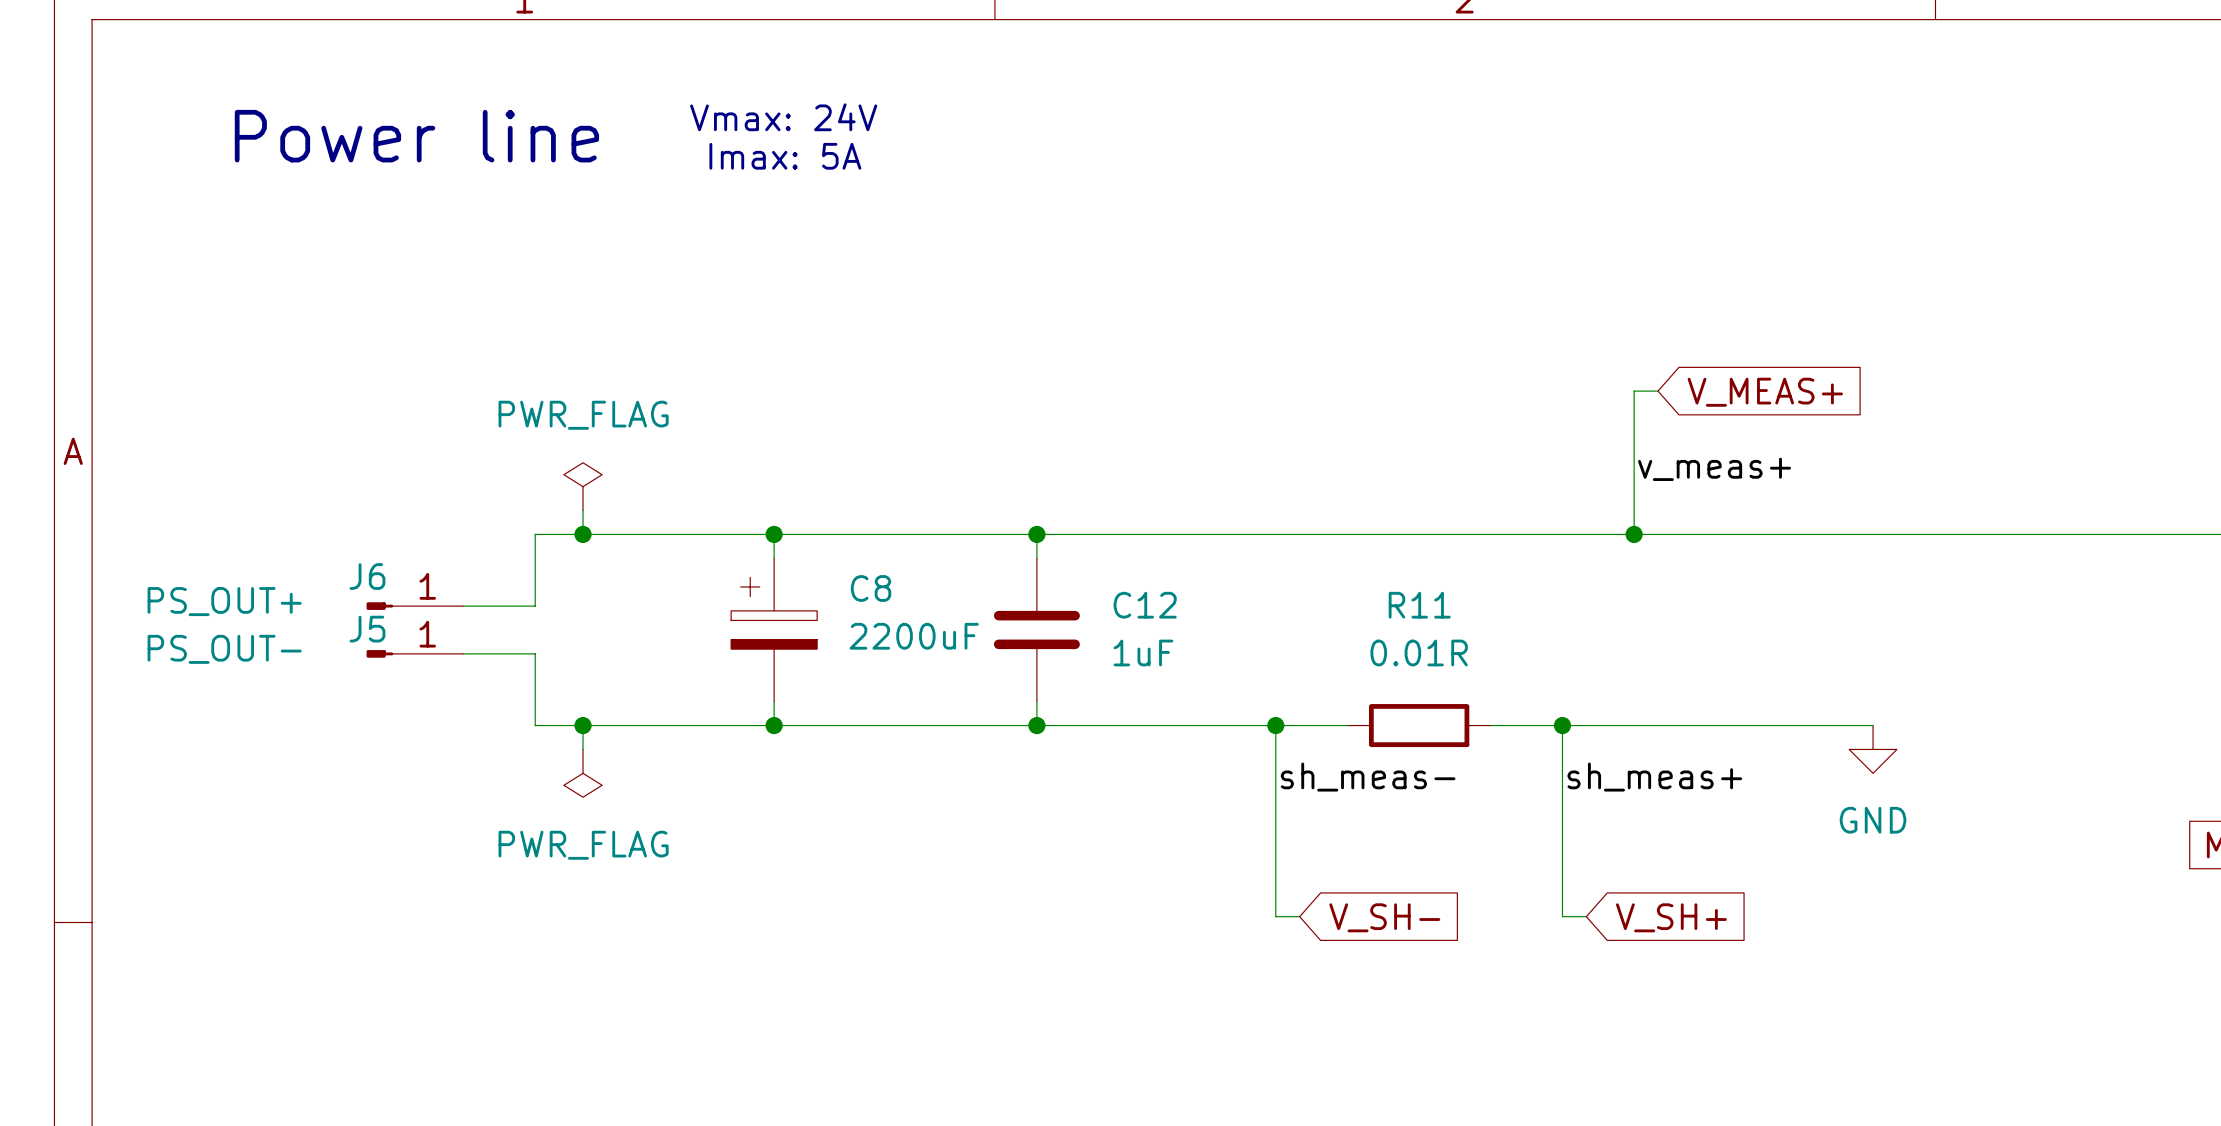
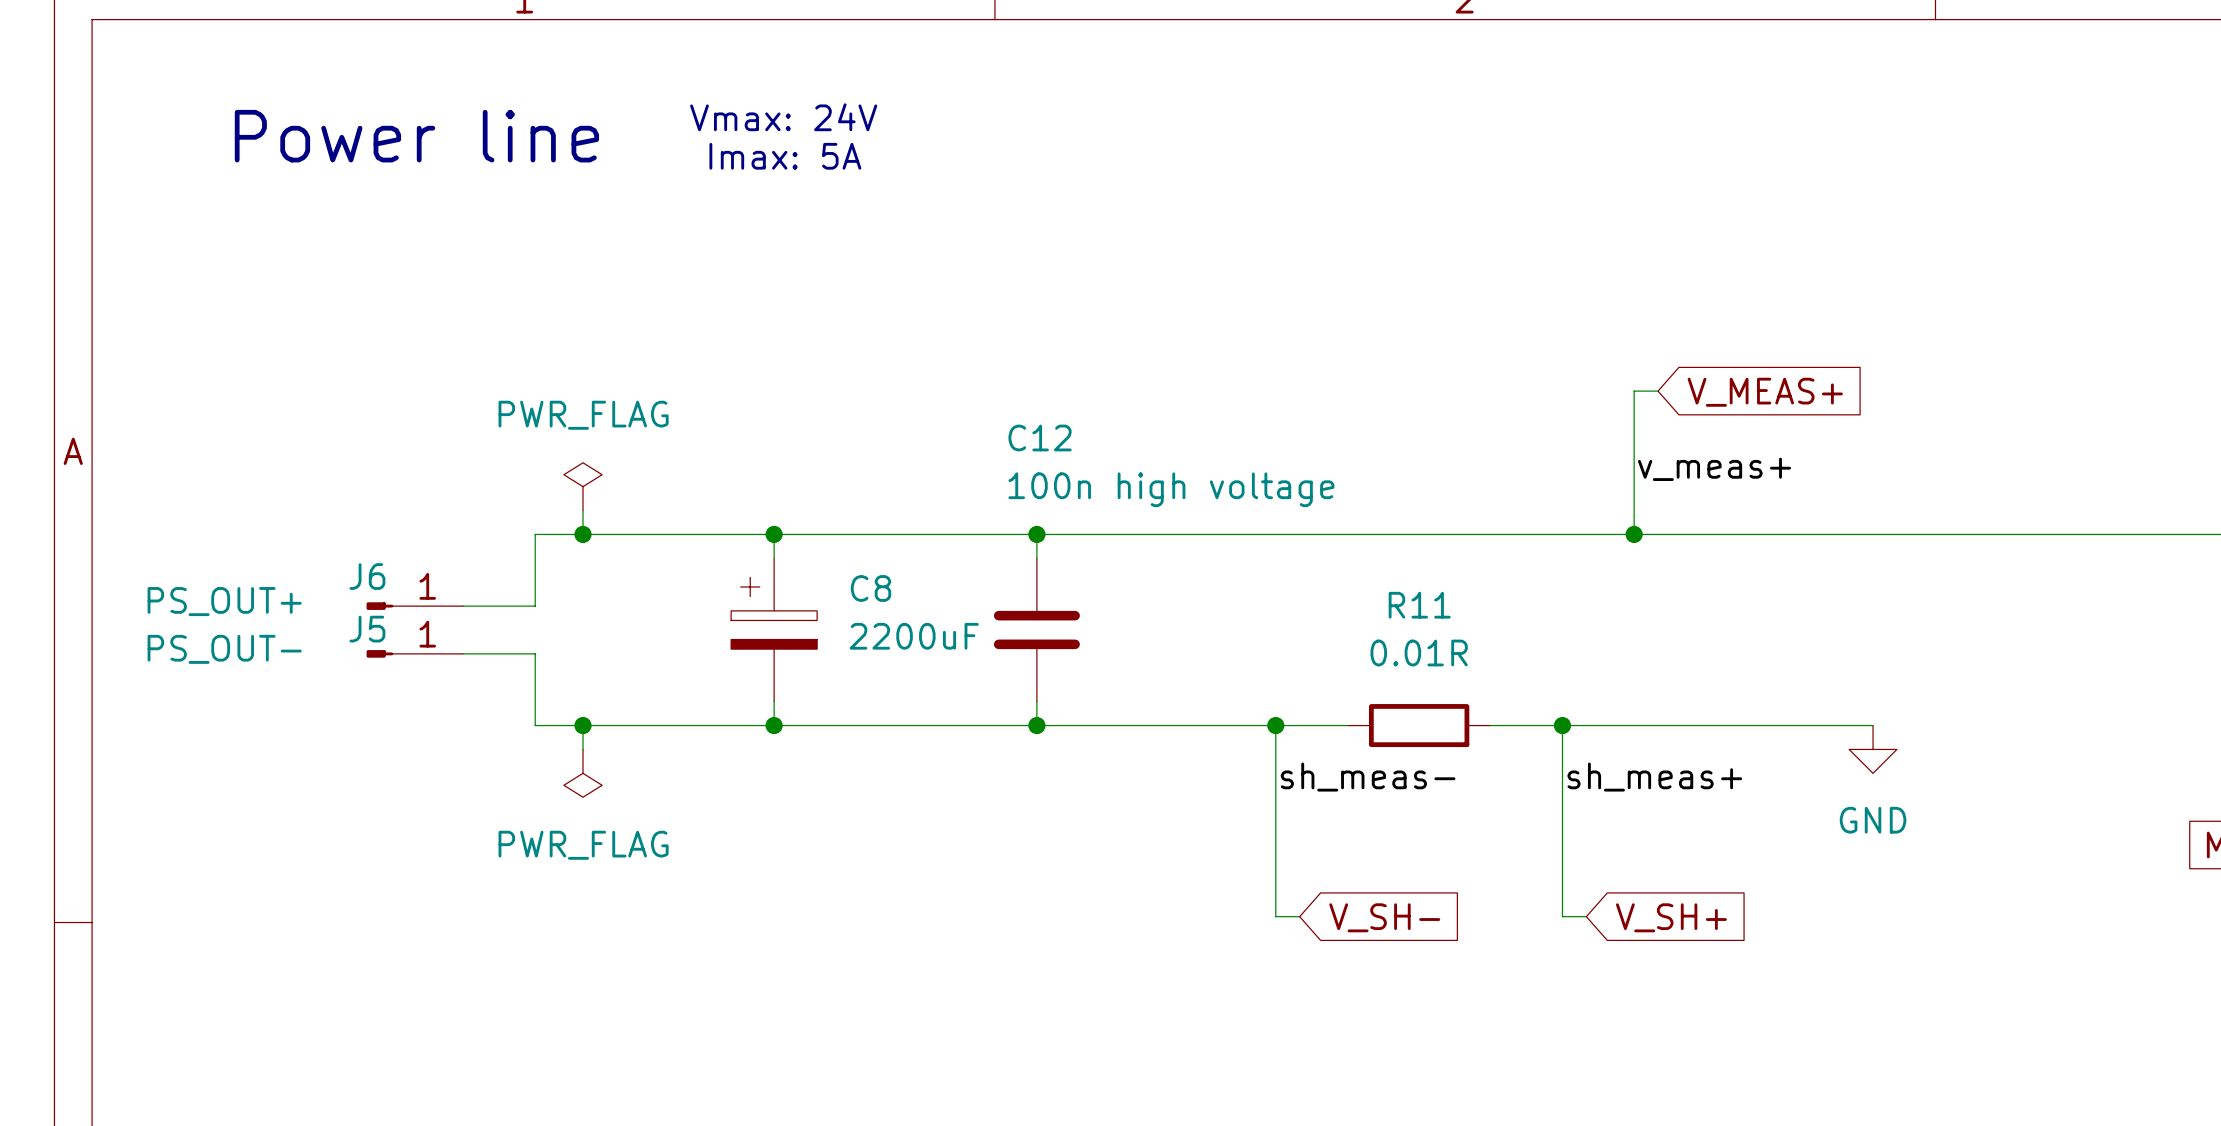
C12 name position: C12 (1145, 605) -> C12 (1040, 437)
C12 value: 1uF (1143, 652) -> 100n high voltage (1171, 489)

